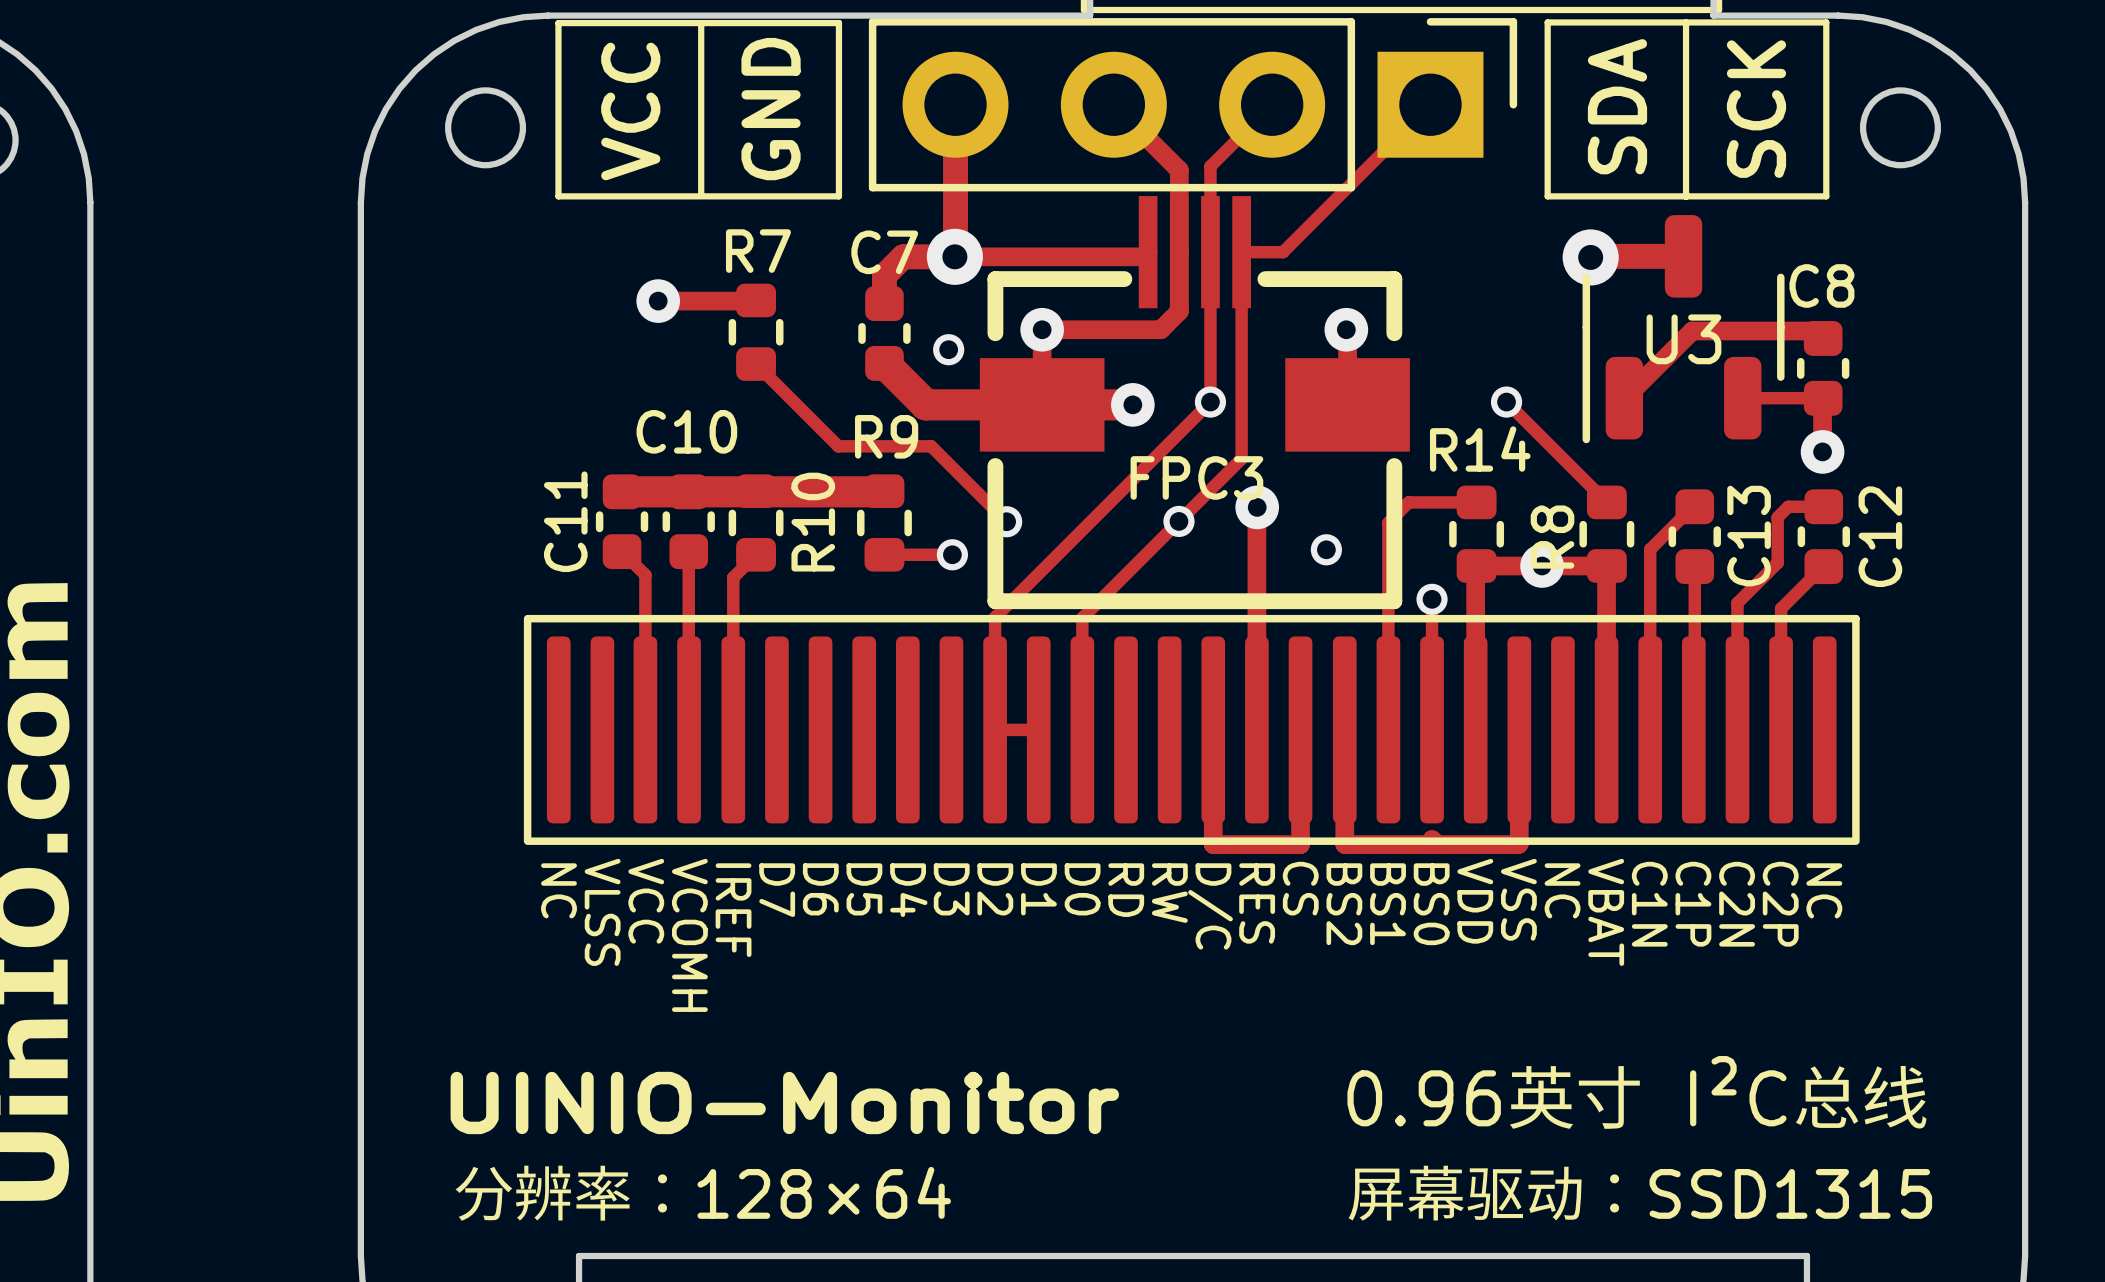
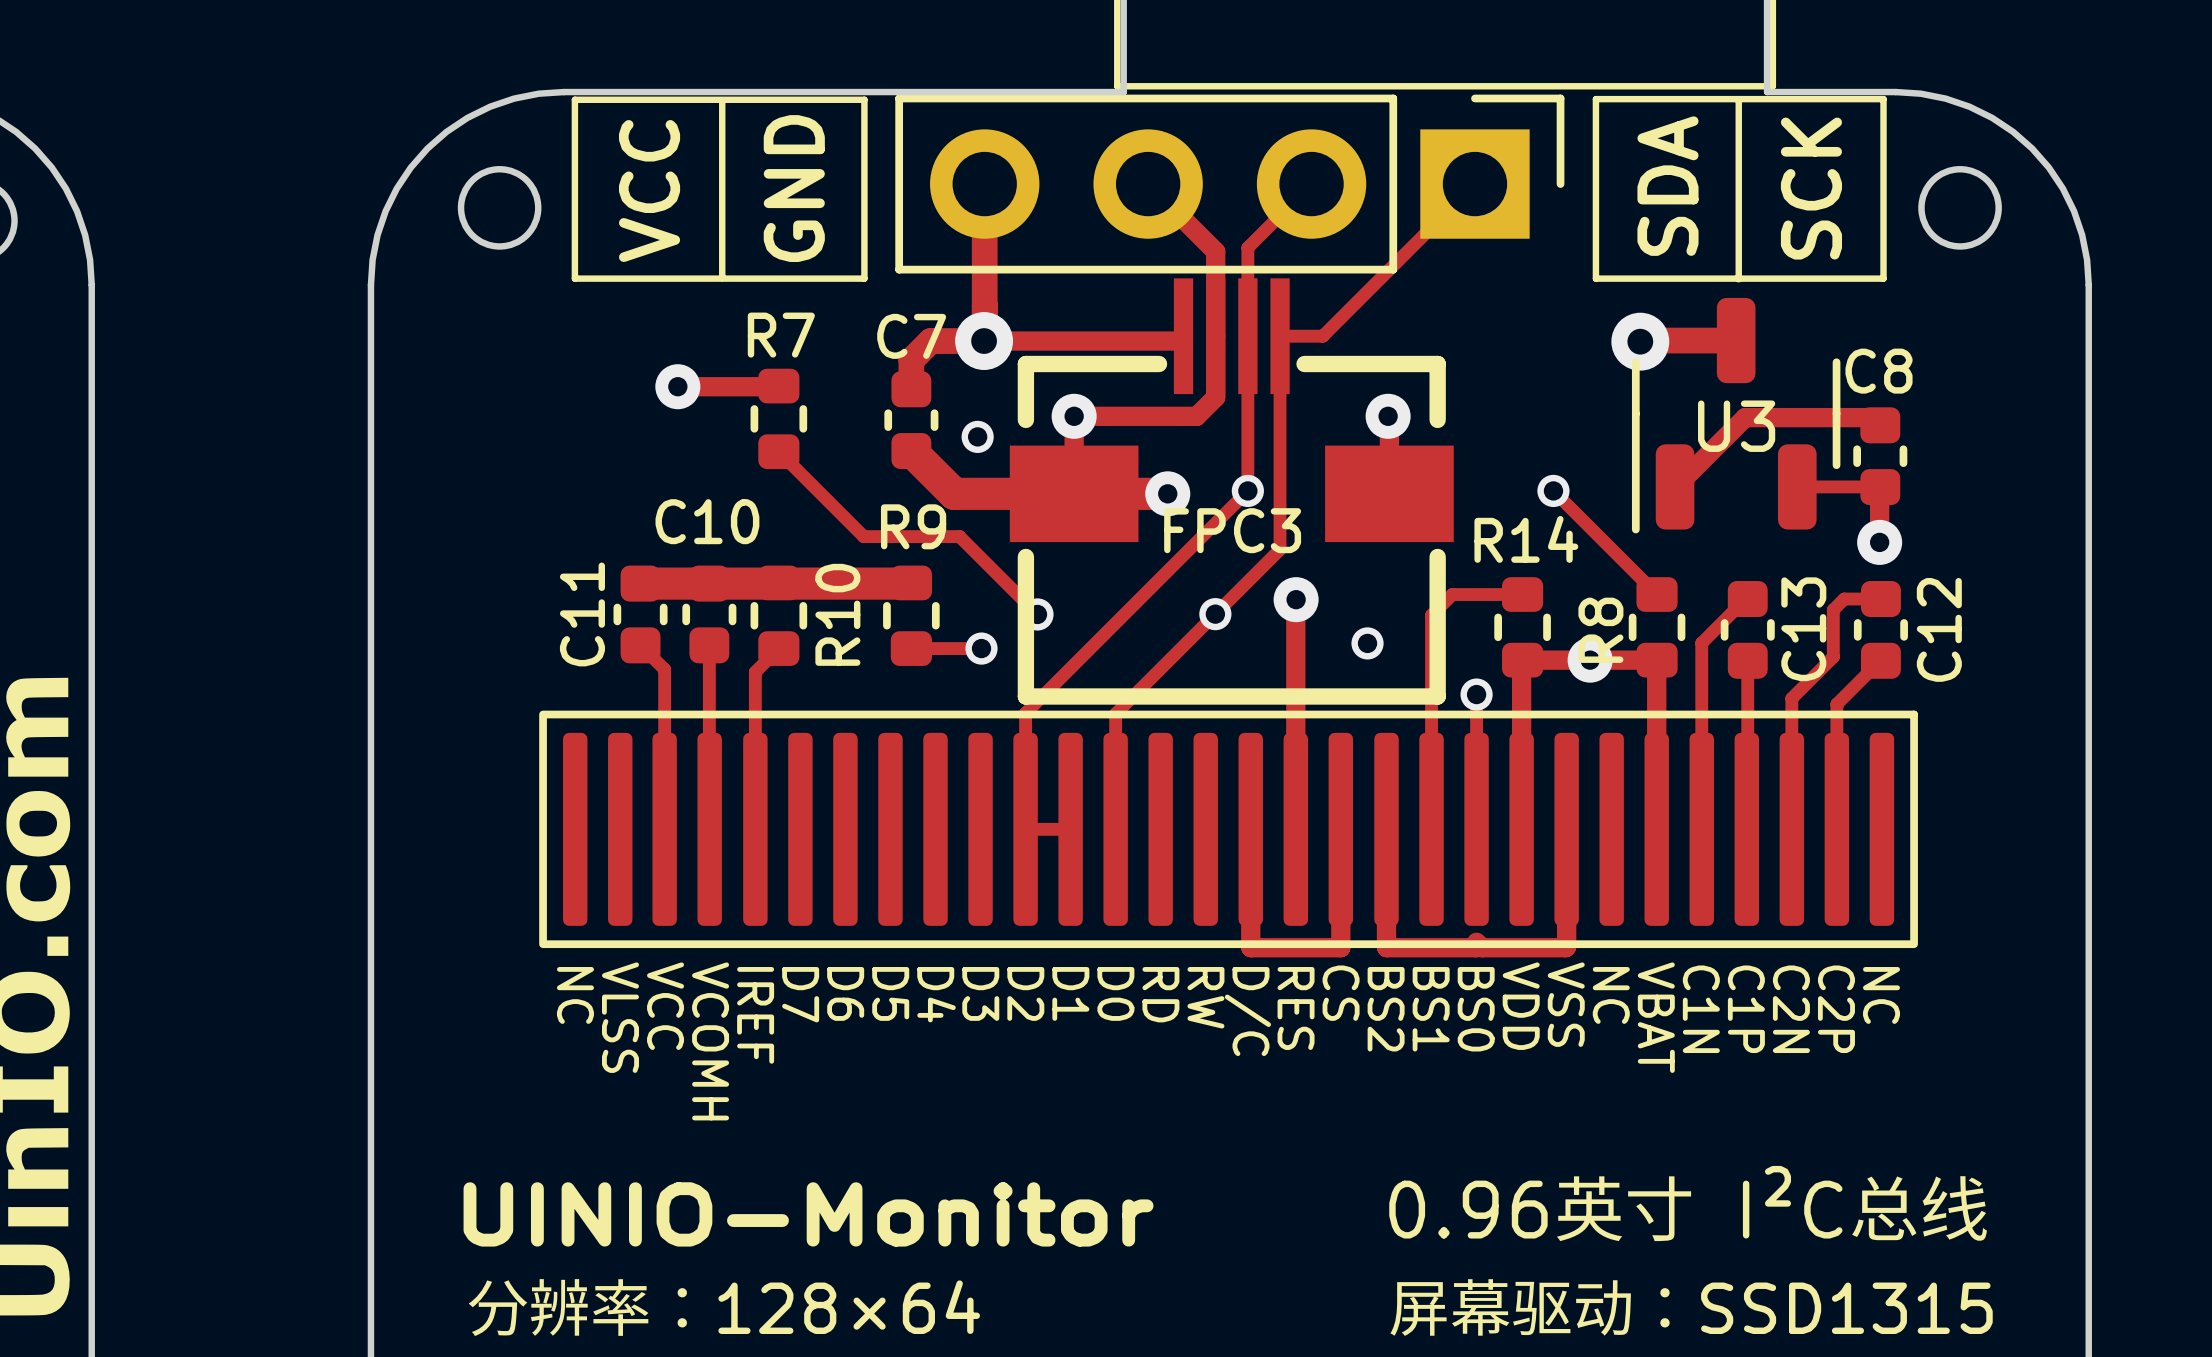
FPC3 name position: FPC3 (1196, 477) -> FPC3 (1232, 530)

